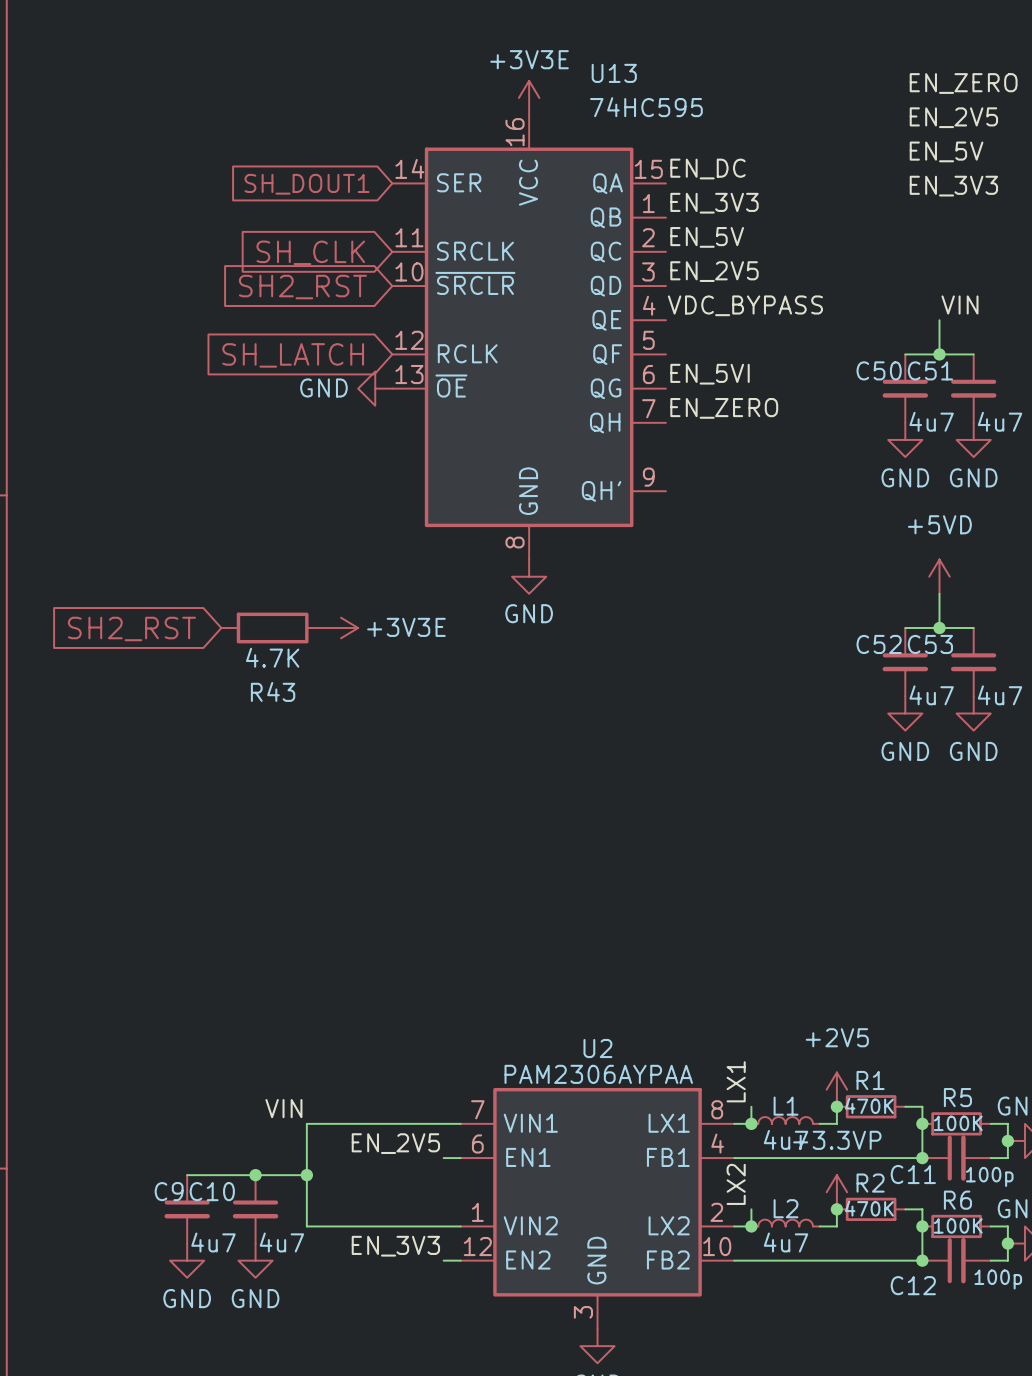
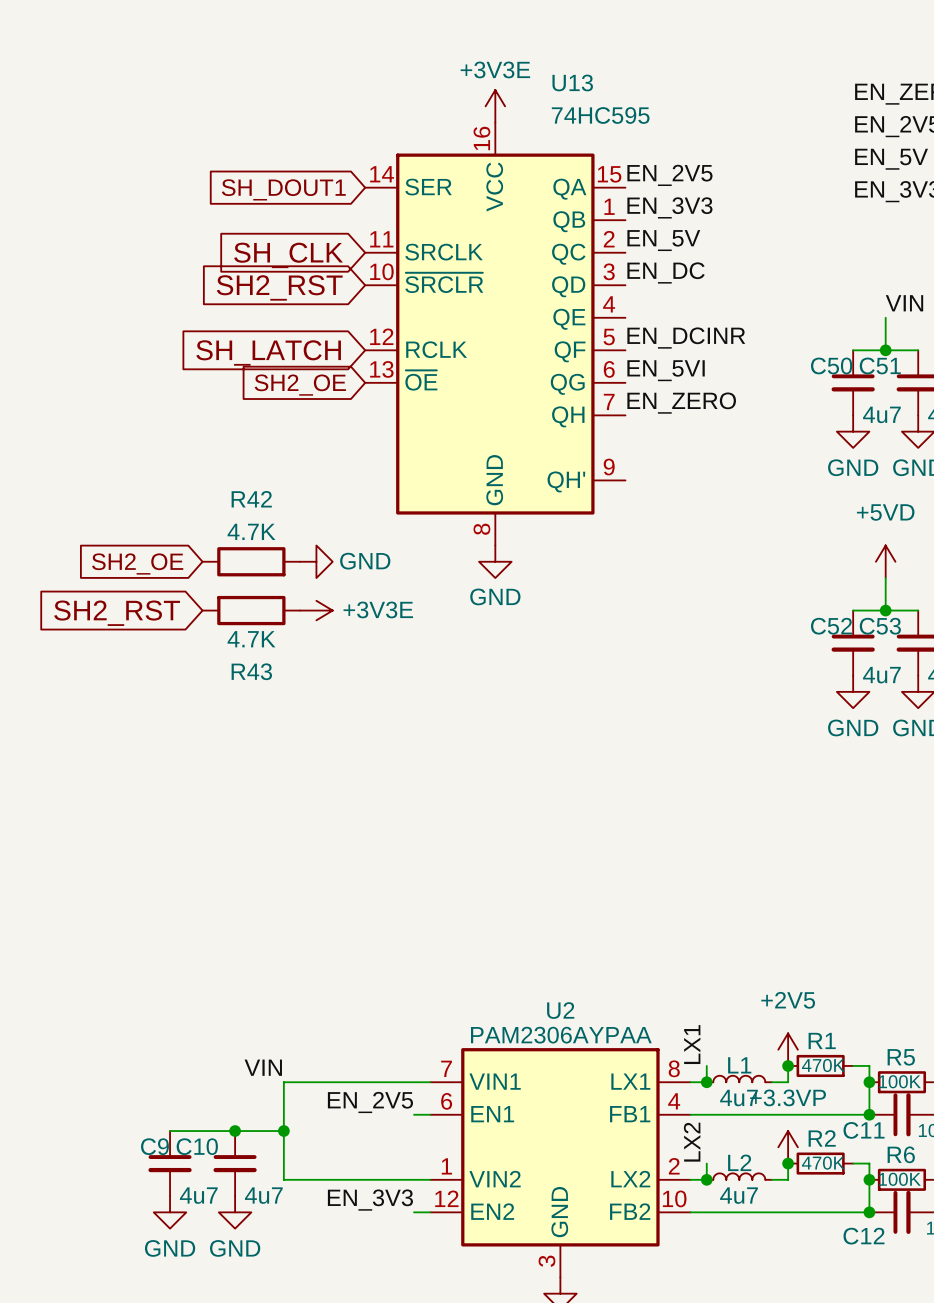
label: EN_DC (707, 169) -> EN_2V5 (669, 175)
label: EN_2V5 (714, 271) -> EN_DC (666, 272)
label: VDC_BYPASS (745, 305) -> none
label: none -> EN_DCINR (686, 338)
power symbol rotation: 0° (375, 388) -> 180° (316, 561)
power symbol position: GND (375, 388) -> GND (316, 561)
global label: none -> SH2_OE (300, 385)
R42: none -> 4.7K (251, 561)
global label: none -> SH2_OE (137, 563)

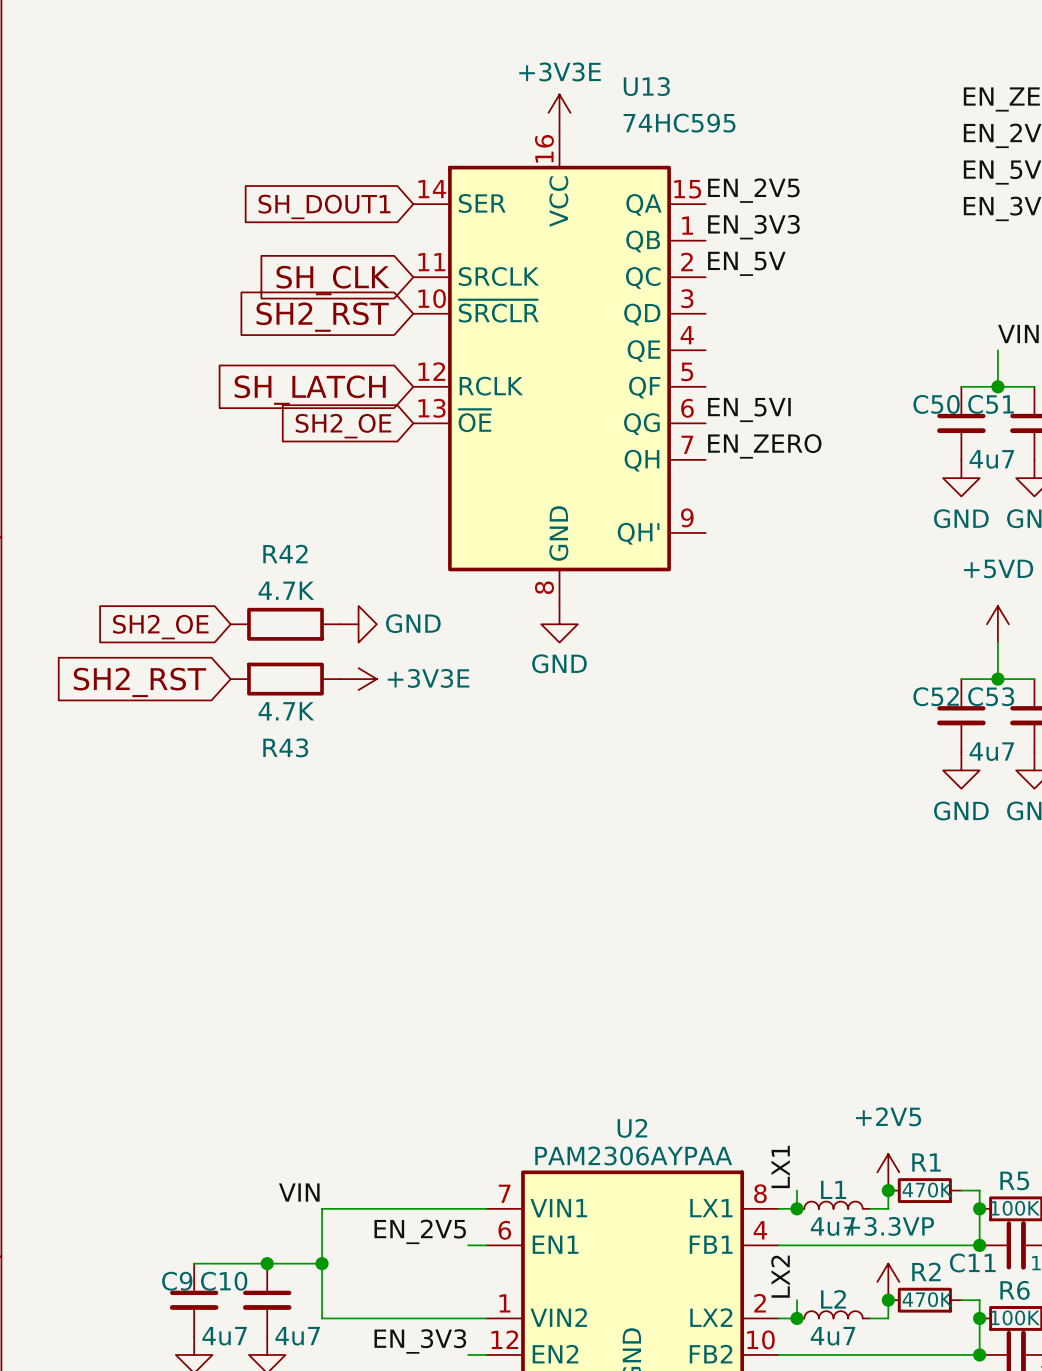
label: EN_DC (666, 272) -> none
label: EN_DCINR (686, 338) -> none

